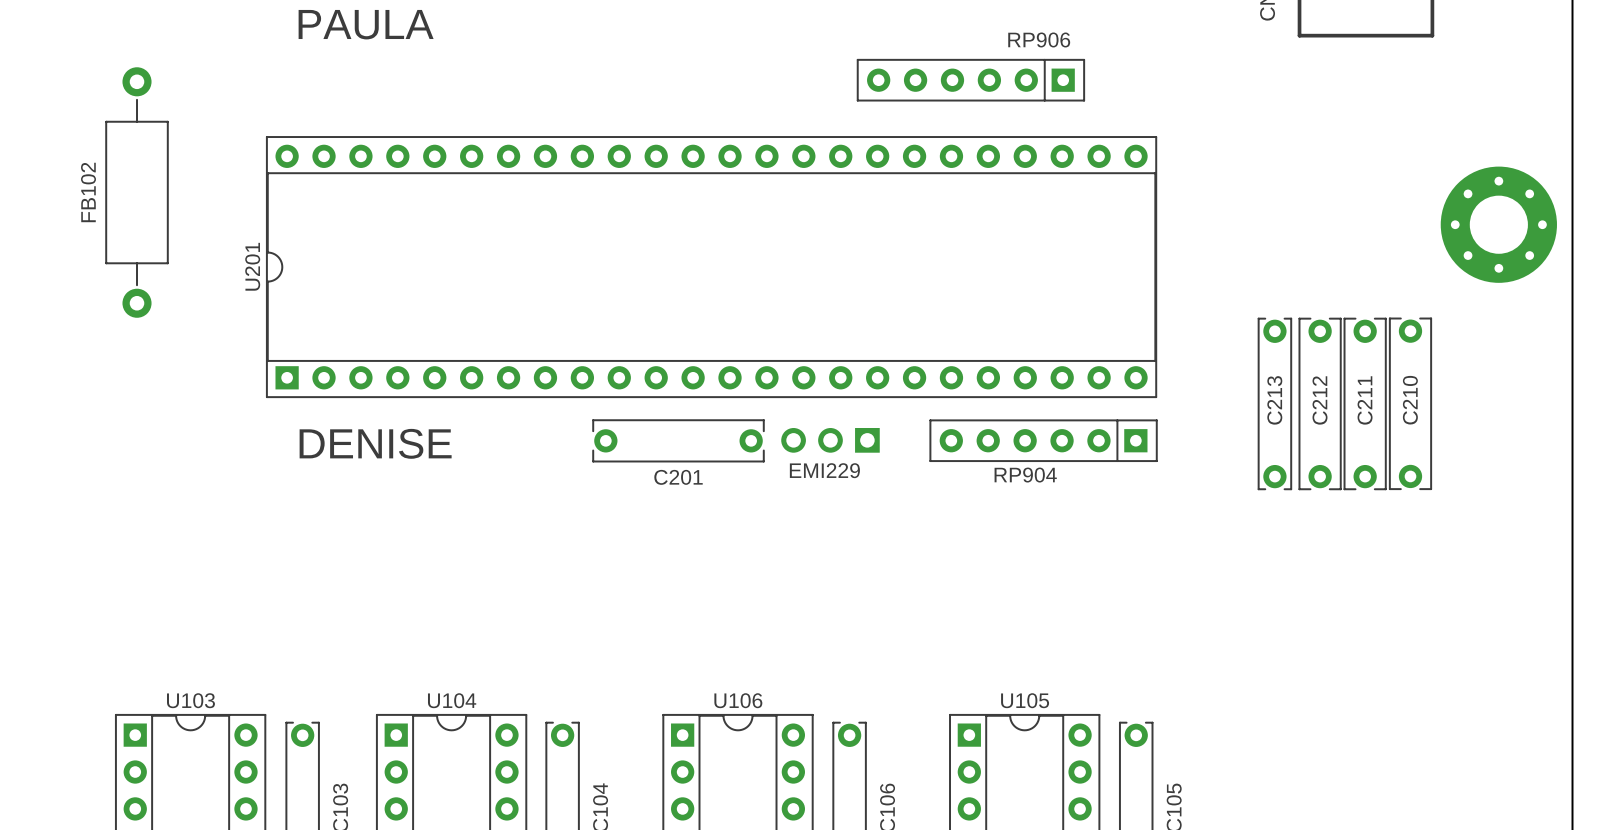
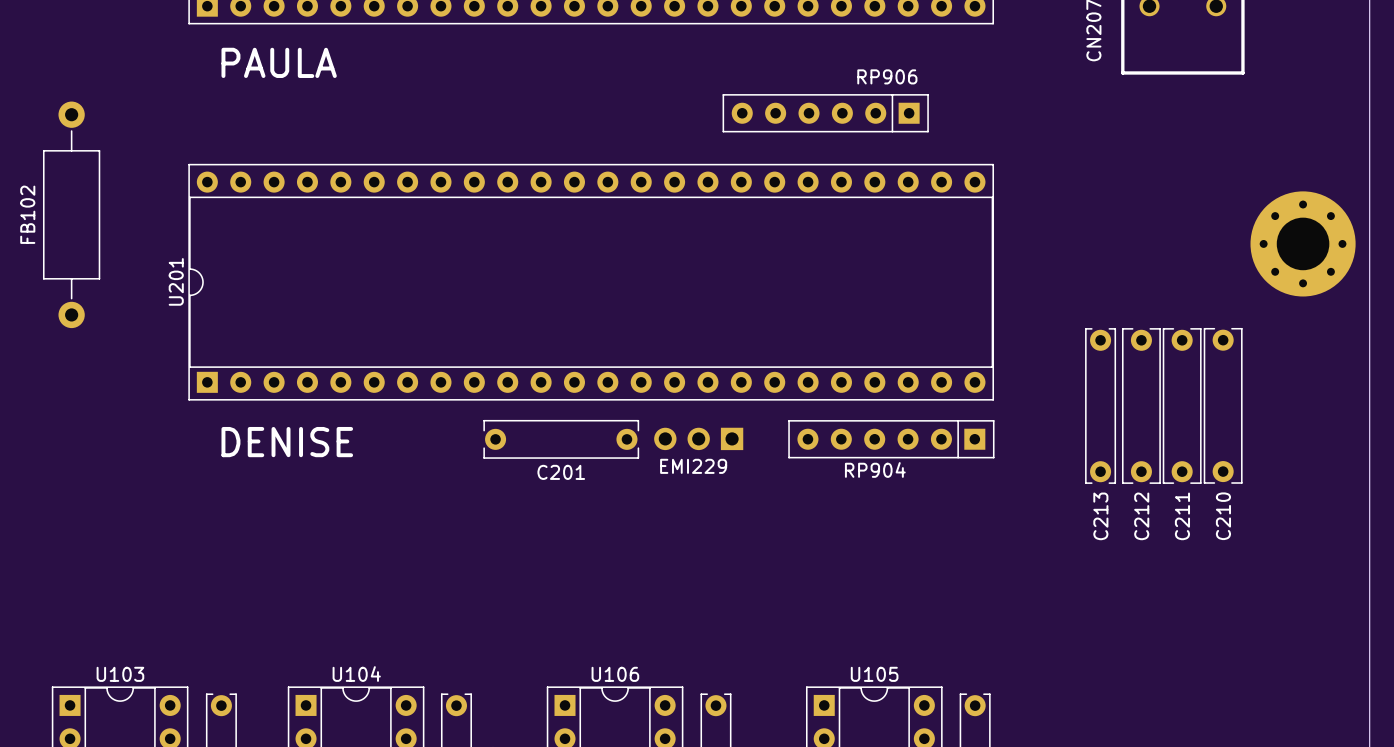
C213 name position: C213 (1274, 400) -> C213 (1100, 516)
C212 name position: C212 (1320, 400) -> C212 (1141, 516)
C211 name position: C211 (1365, 400) -> C211 (1182, 516)
C210 name position: C210 (1410, 400) -> C210 (1223, 516)

